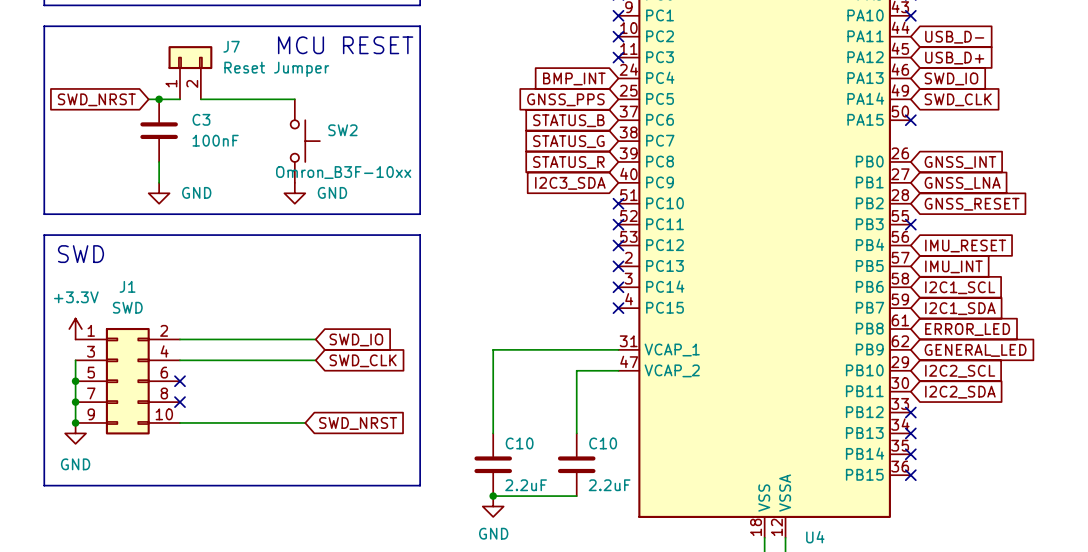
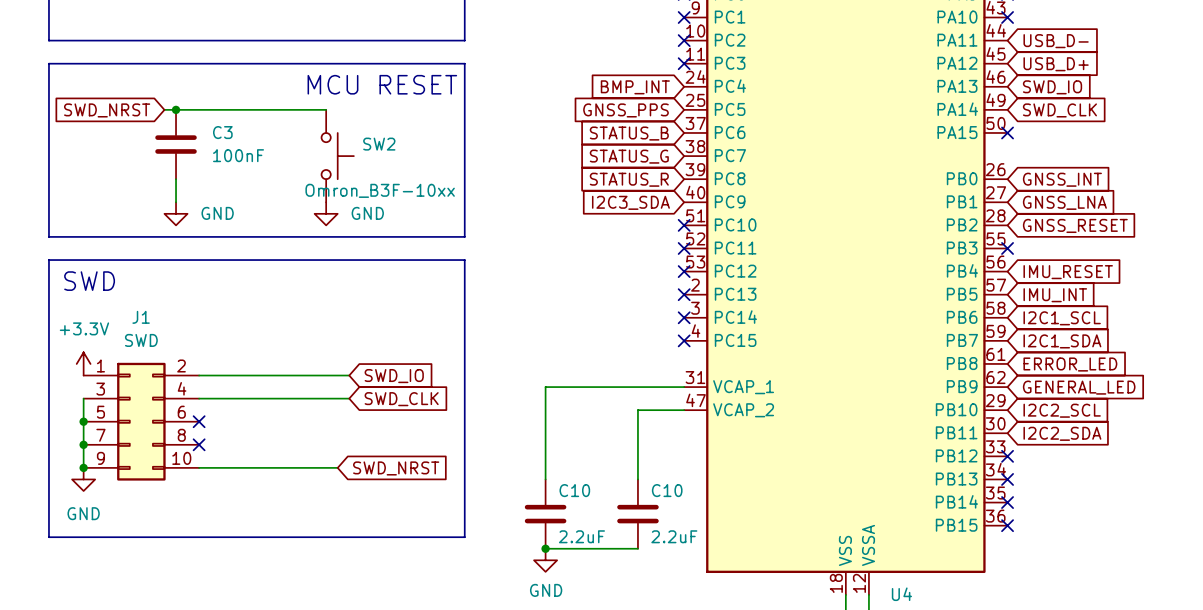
line: (44, 5) (420, 5) -> (48, 5) (48, 29)
line: (44, 26) (420, 26) -> (464, 5) (464, 29)
line: (44, 36) (44, 57) -> (48, 40) (464, 40)
line: (420, 36) (420, 57) -> (48, 63) (464, 63)
text position: MCU RESET (345, 45) -> MCU RESET (382, 84)
J7: Reset Jumper (190, 72) -> none
wire: none -> (199, 109) (222, 109)

